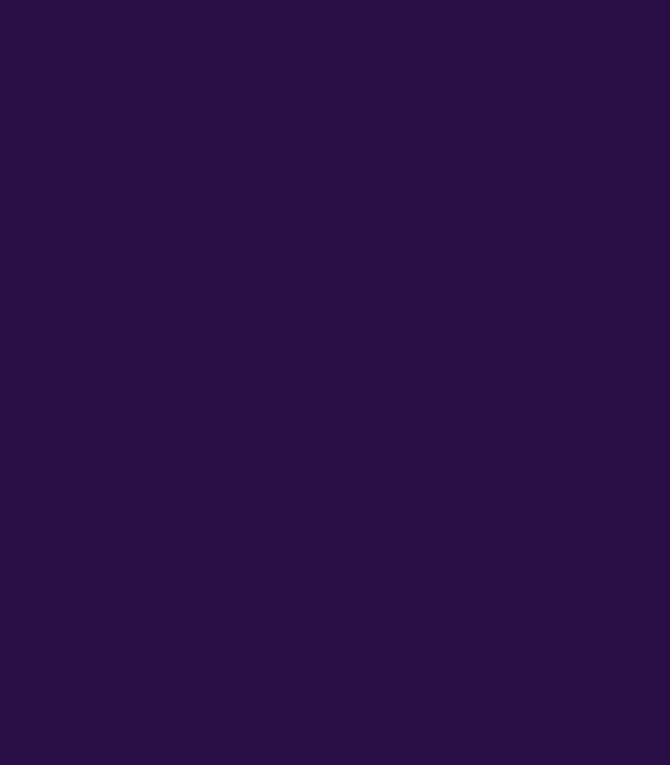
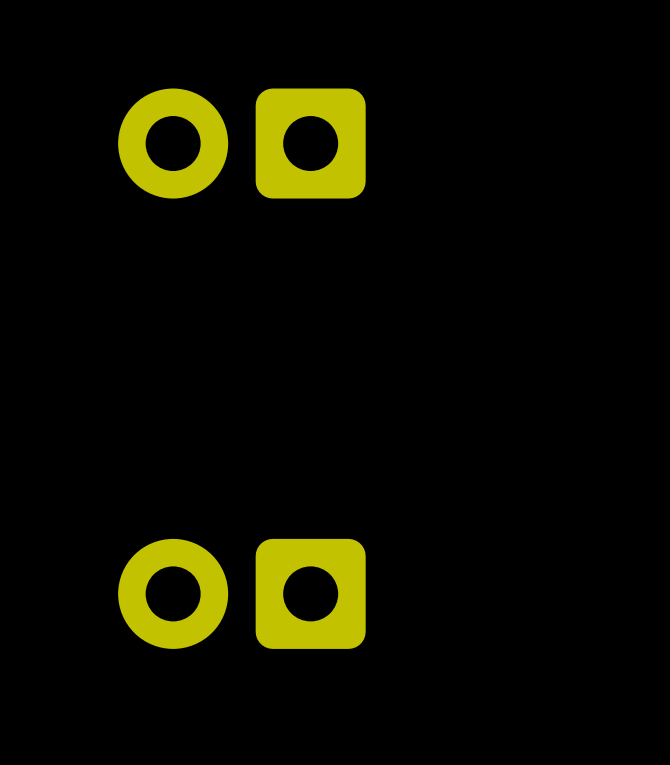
part: none -> (241, 143)
part: none -> (241, 593)

